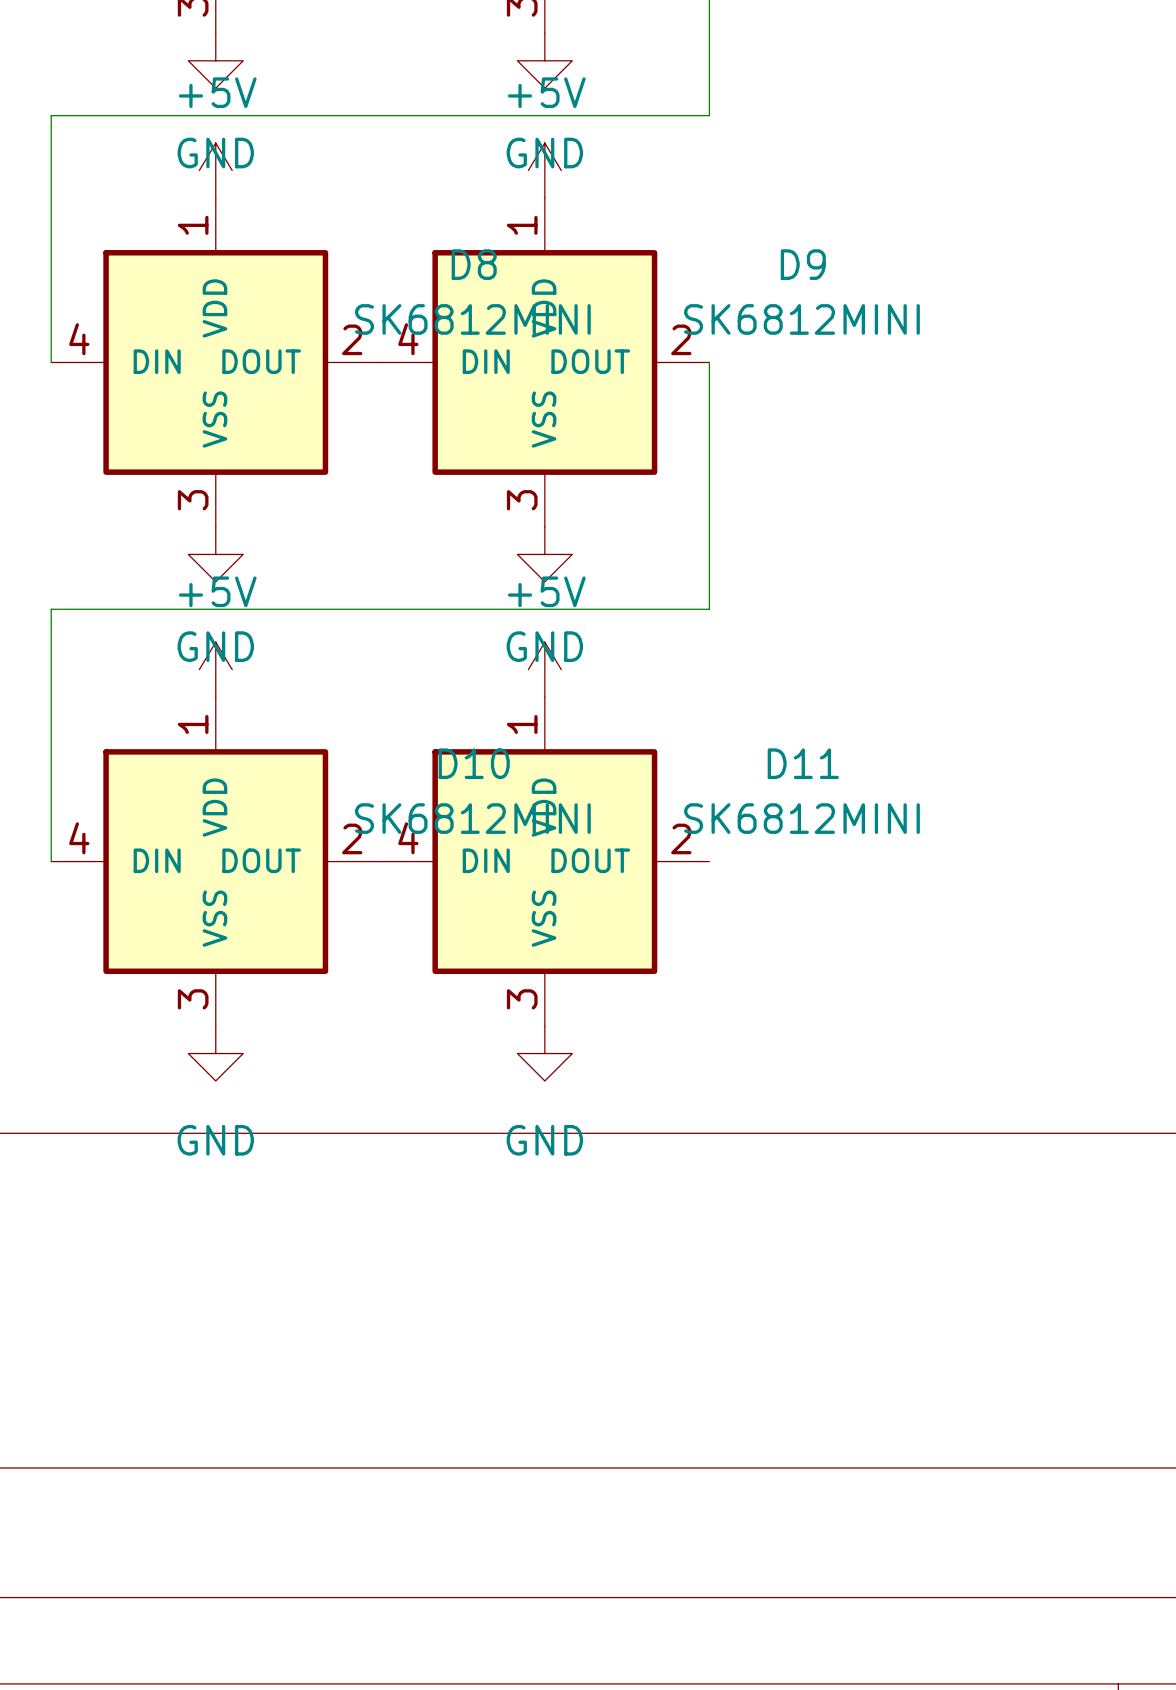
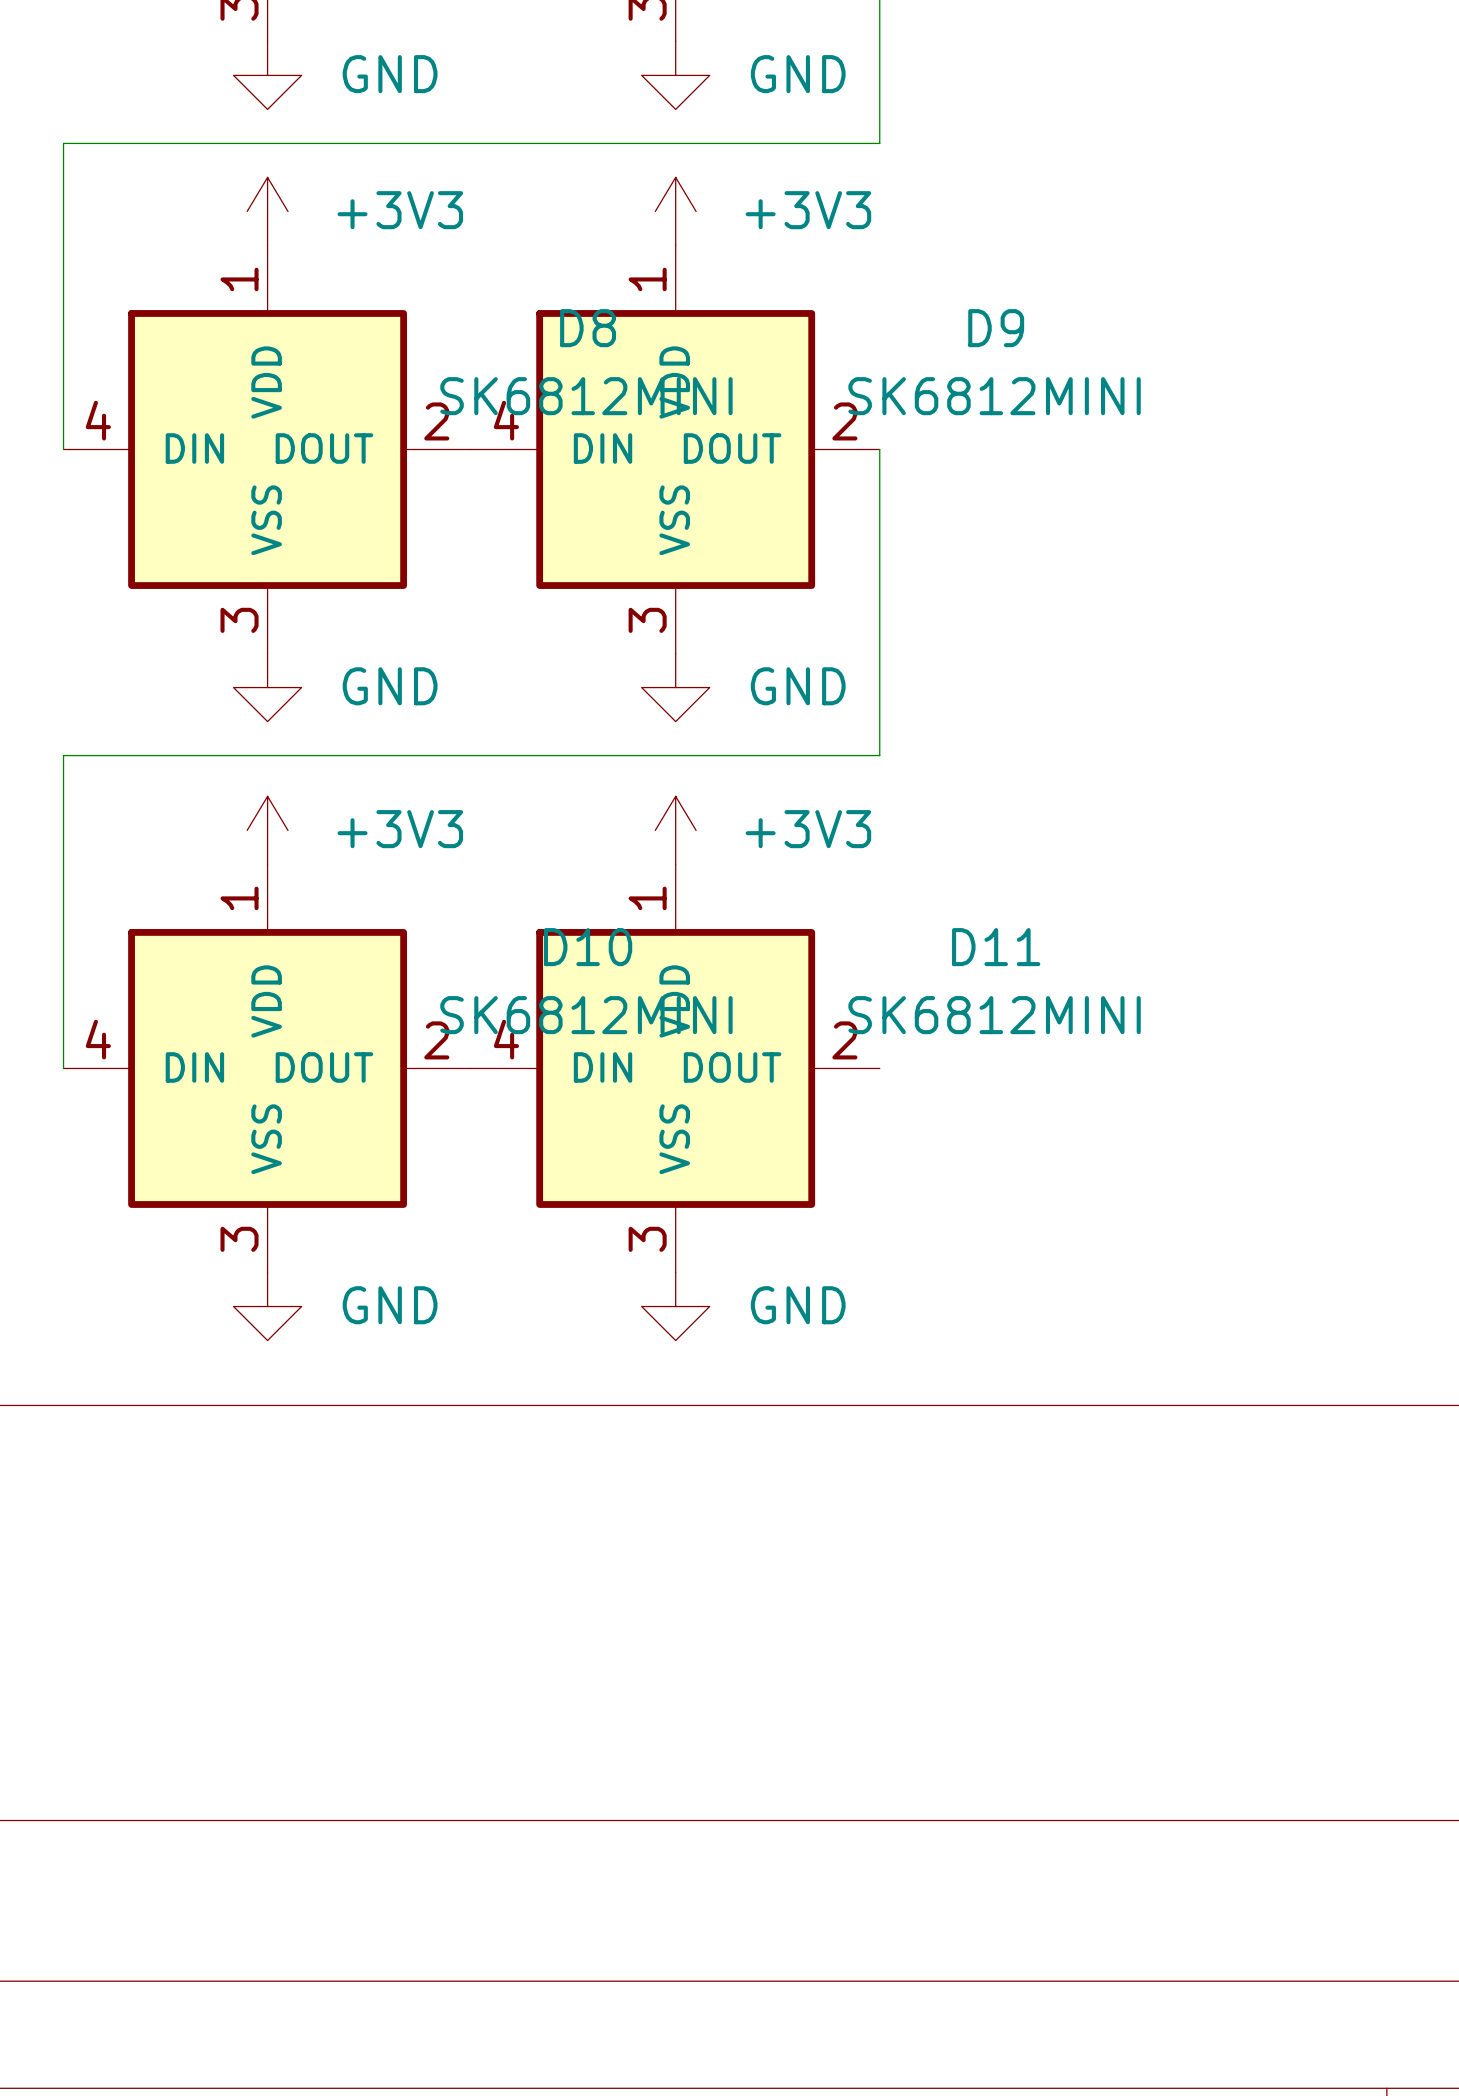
power symbol text position: GND (215, 153) -> GND (390, 74)
power symbol text position: GND (544, 153) -> GND (798, 74)
power symbol: +5V (215, 170) -> +3V3 (267, 211)
power symbol: +5V (544, 170) -> +3V3 (675, 211)
power symbol text position: GND (215, 646) -> GND (390, 686)
power symbol text position: GND (544, 646) -> GND (798, 686)
power symbol: +5V (215, 669) -> +3V3 (267, 830)
power symbol: +5V (544, 669) -> +3V3 (675, 830)
power symbol text position: GND (215, 1140) -> GND (390, 1305)
power symbol text position: GND (544, 1140) -> GND (798, 1305)

